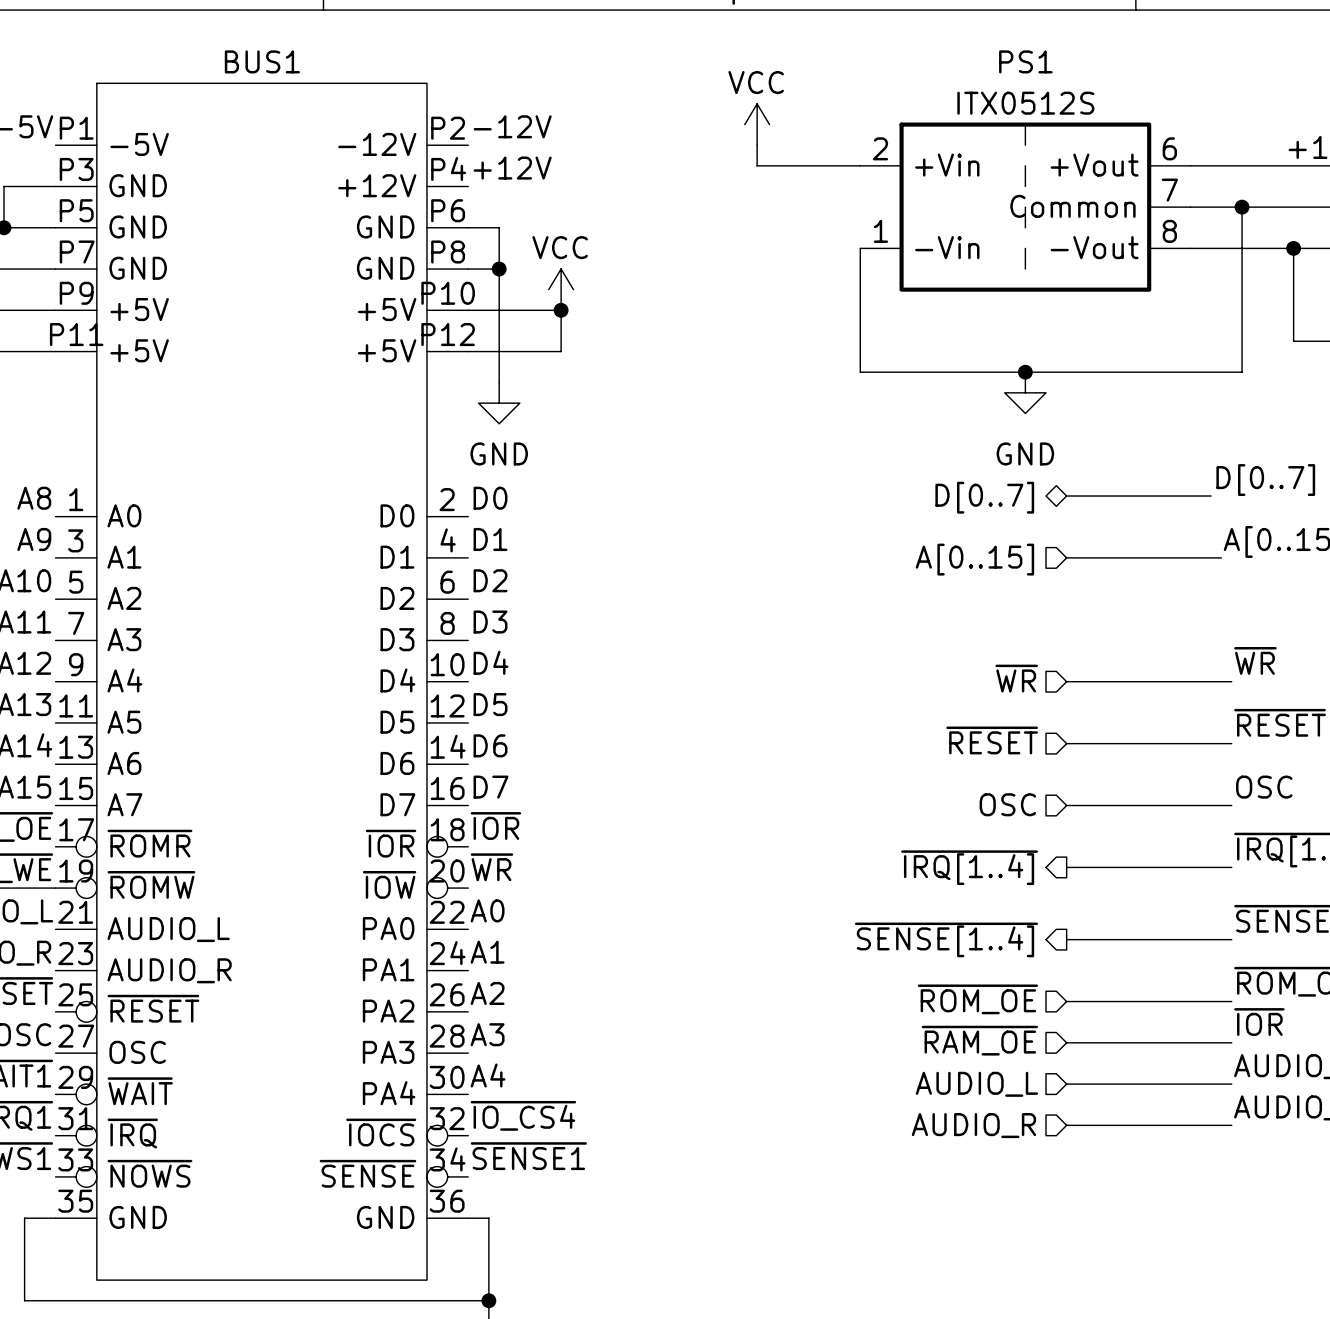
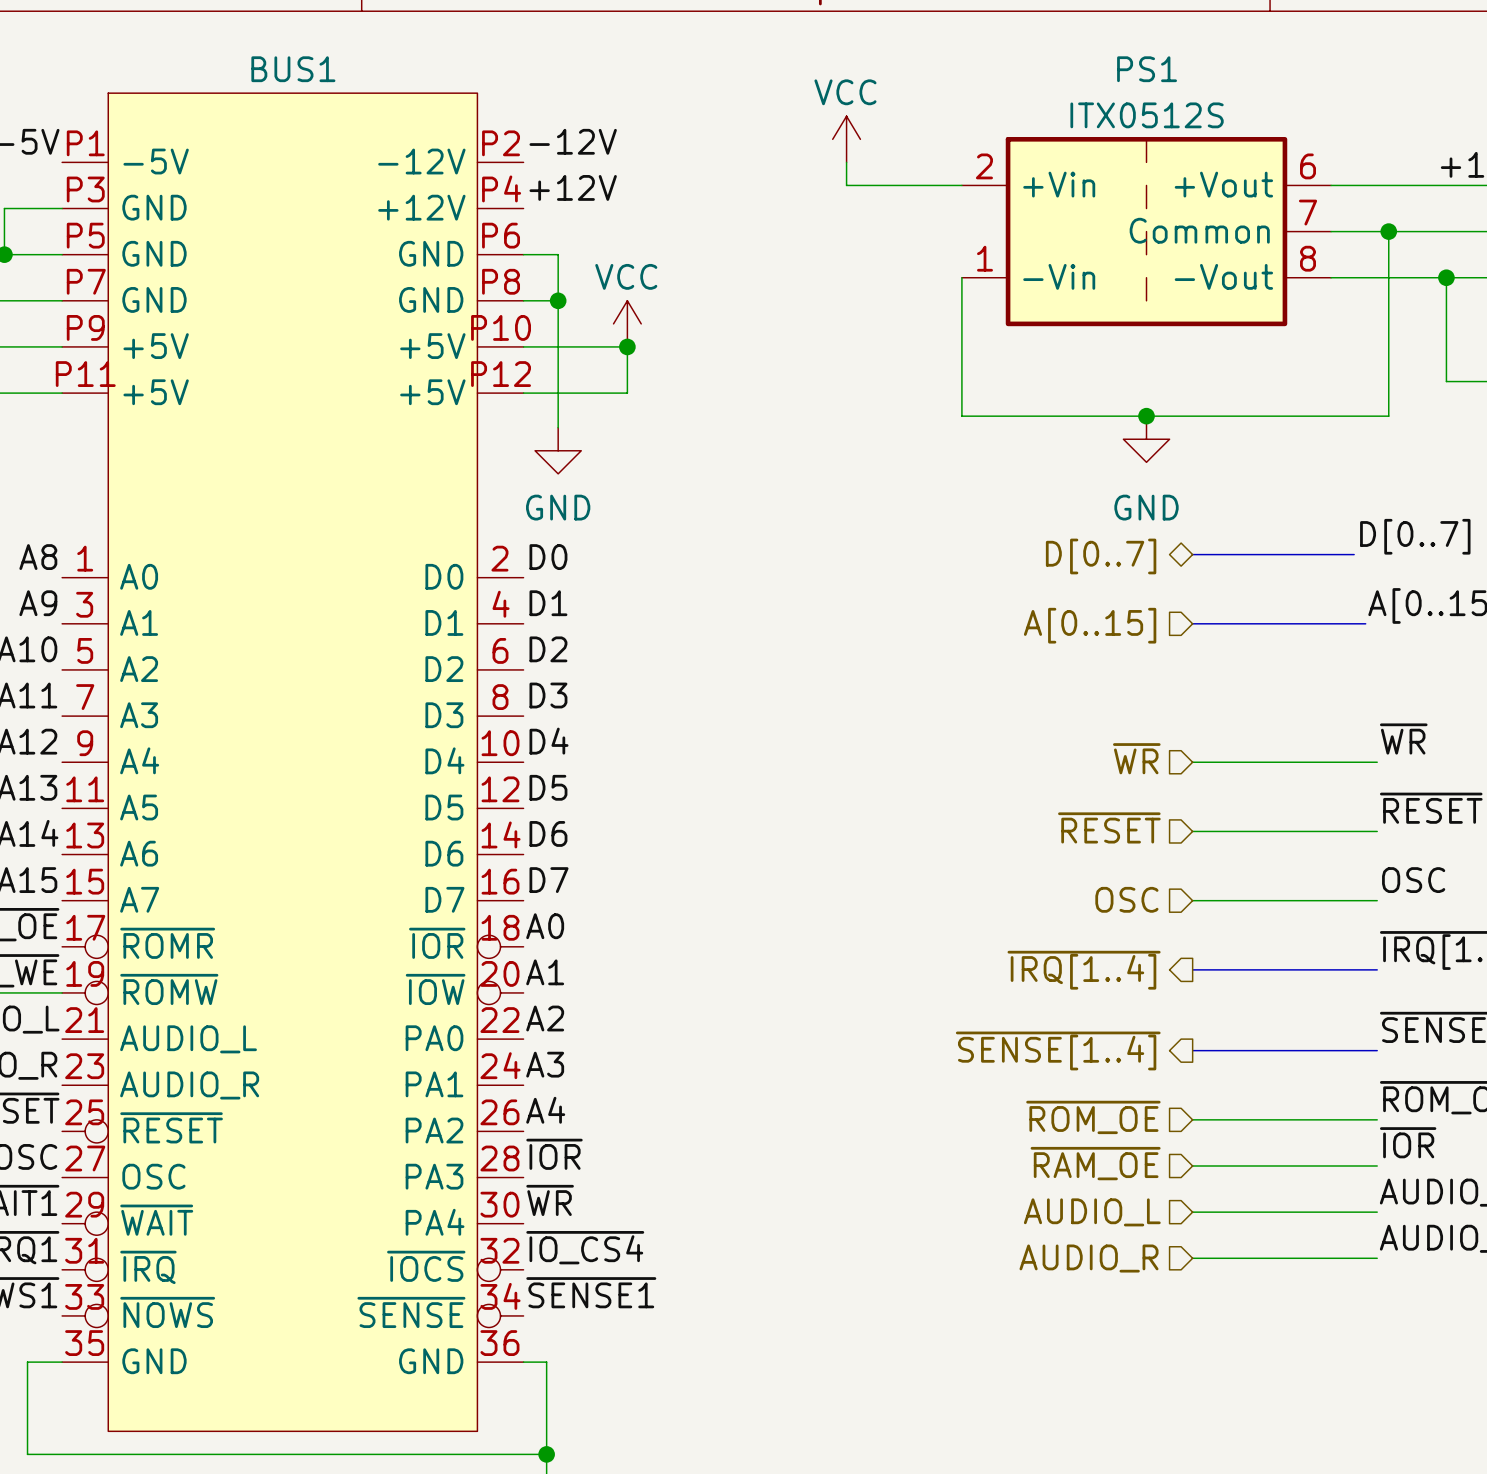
label: ~{IOR} (495, 826) -> A0 (545, 926)
label: ~{WR} (491, 867) -> A1 (545, 972)
label: A0 (487, 910) -> A2 (545, 1018)
label: A1 (487, 952) -> A3 (545, 1064)
label: A2 (487, 993) -> A4 (545, 1110)
label: A3 (487, 1034) -> ~{IOR} (554, 1154)
label: A4 (488, 1075) -> ~{WR} (550, 1200)

